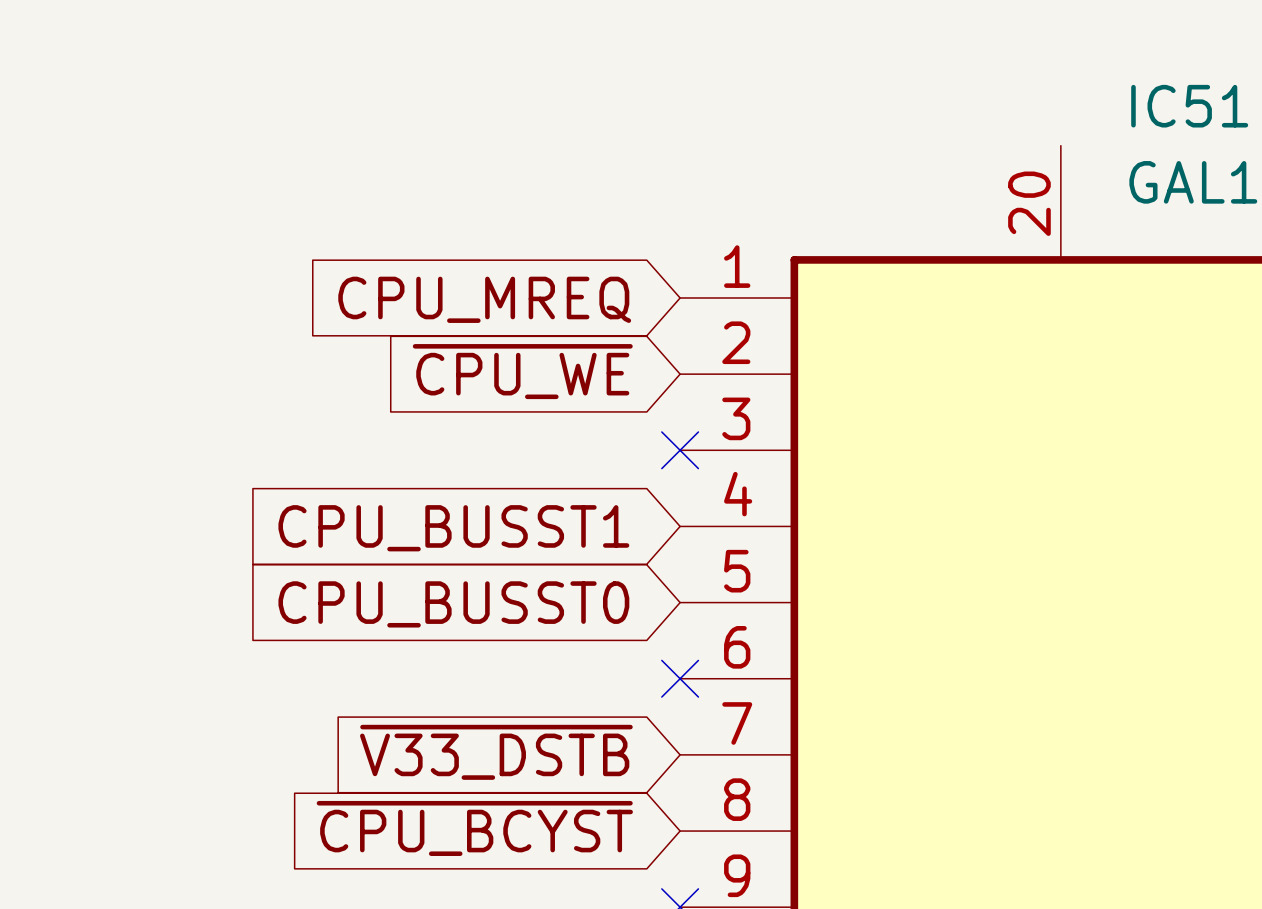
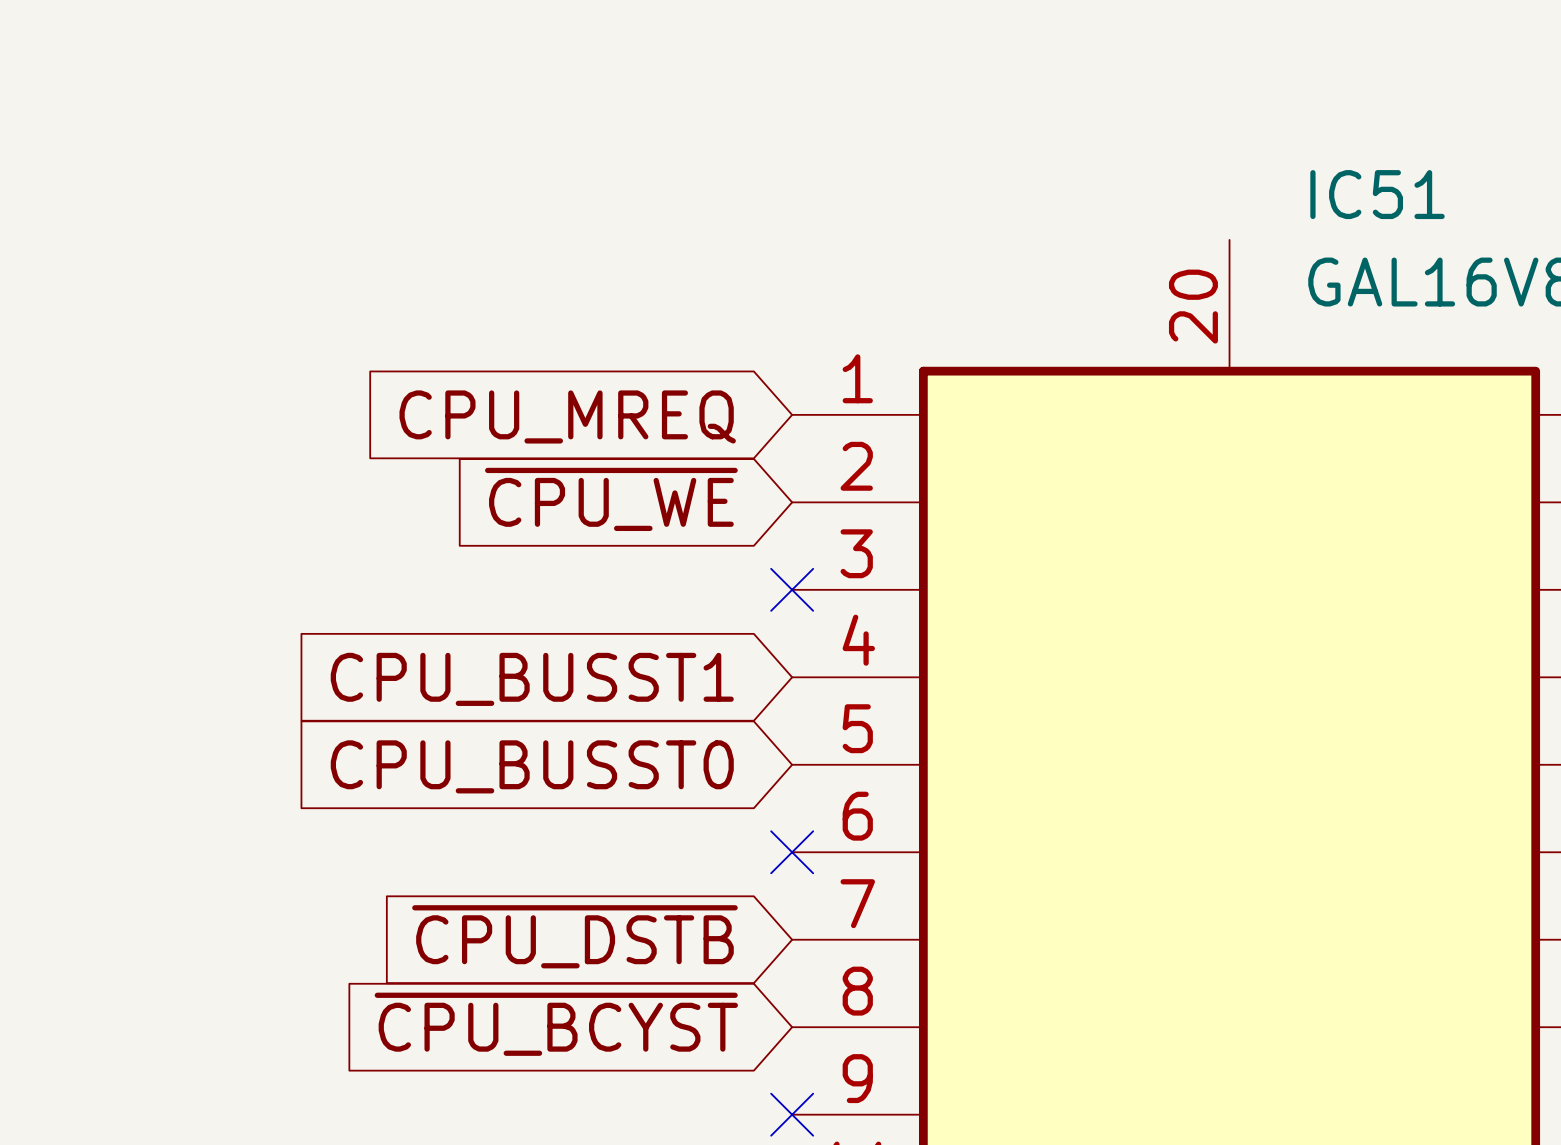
global label: ~{V33_DSTB} (496, 752) -> ~{CPU_DSTB} (574, 936)

